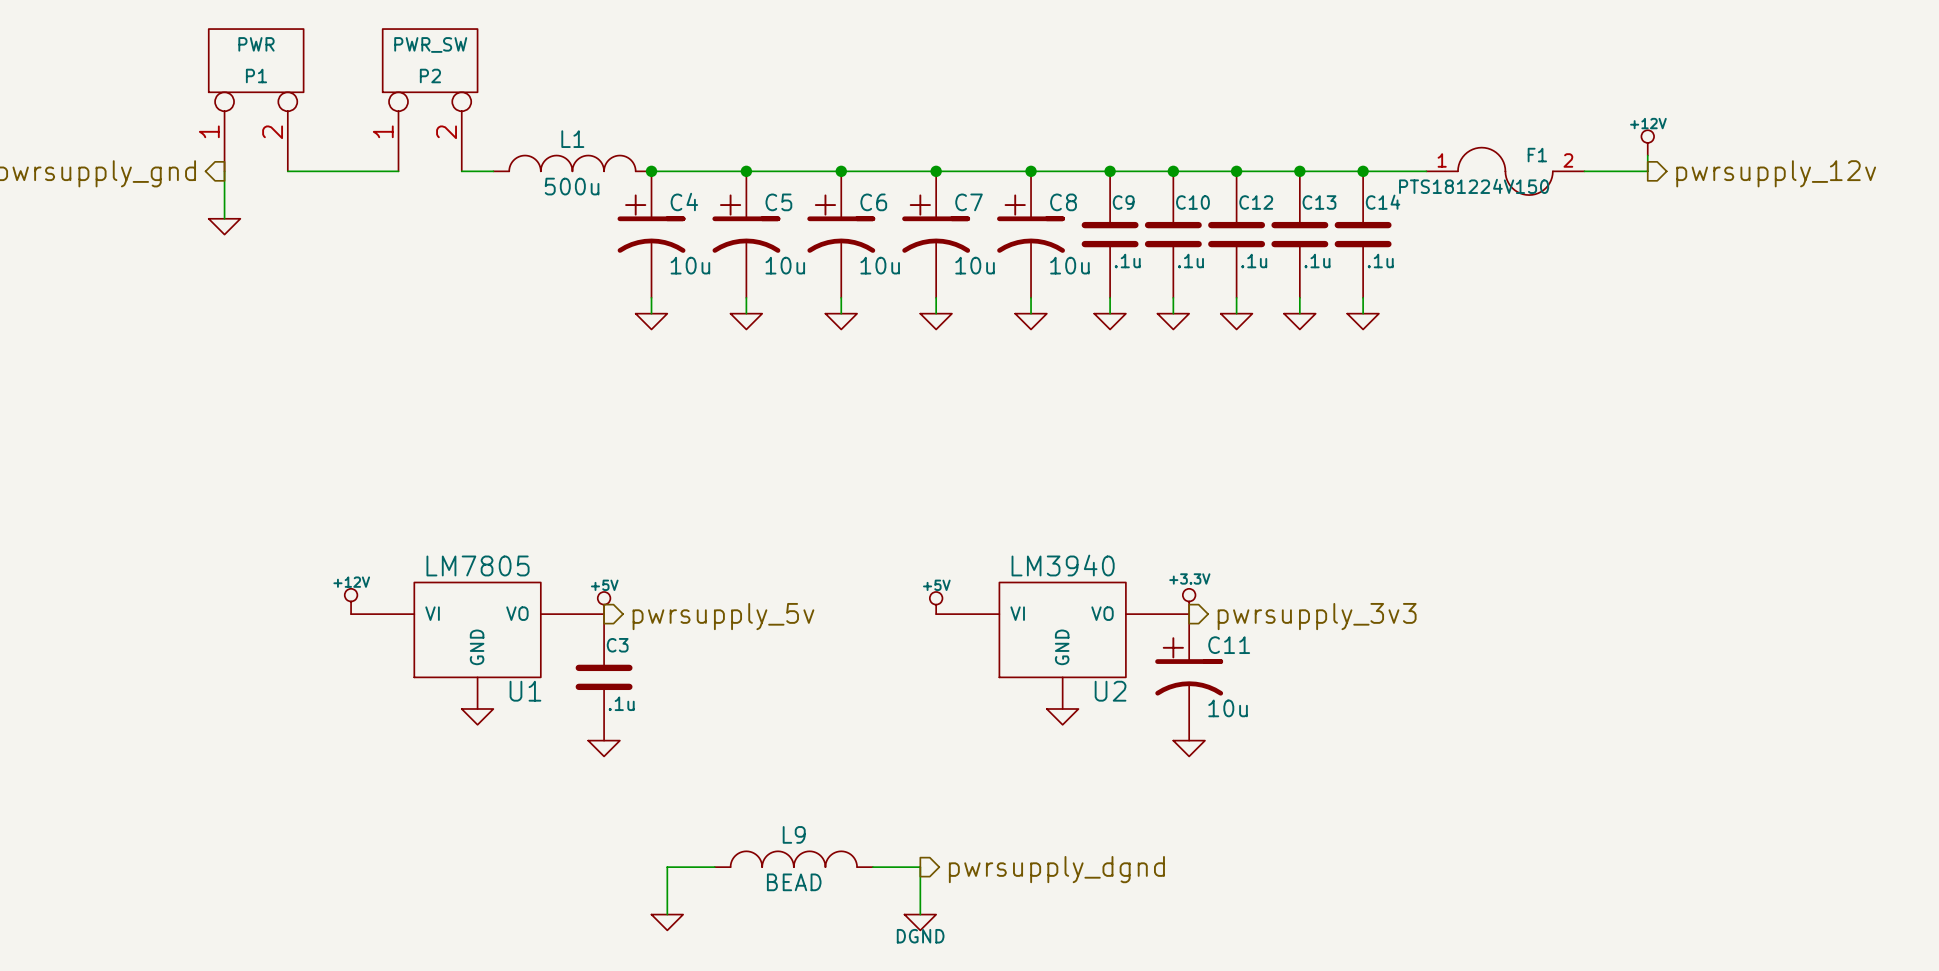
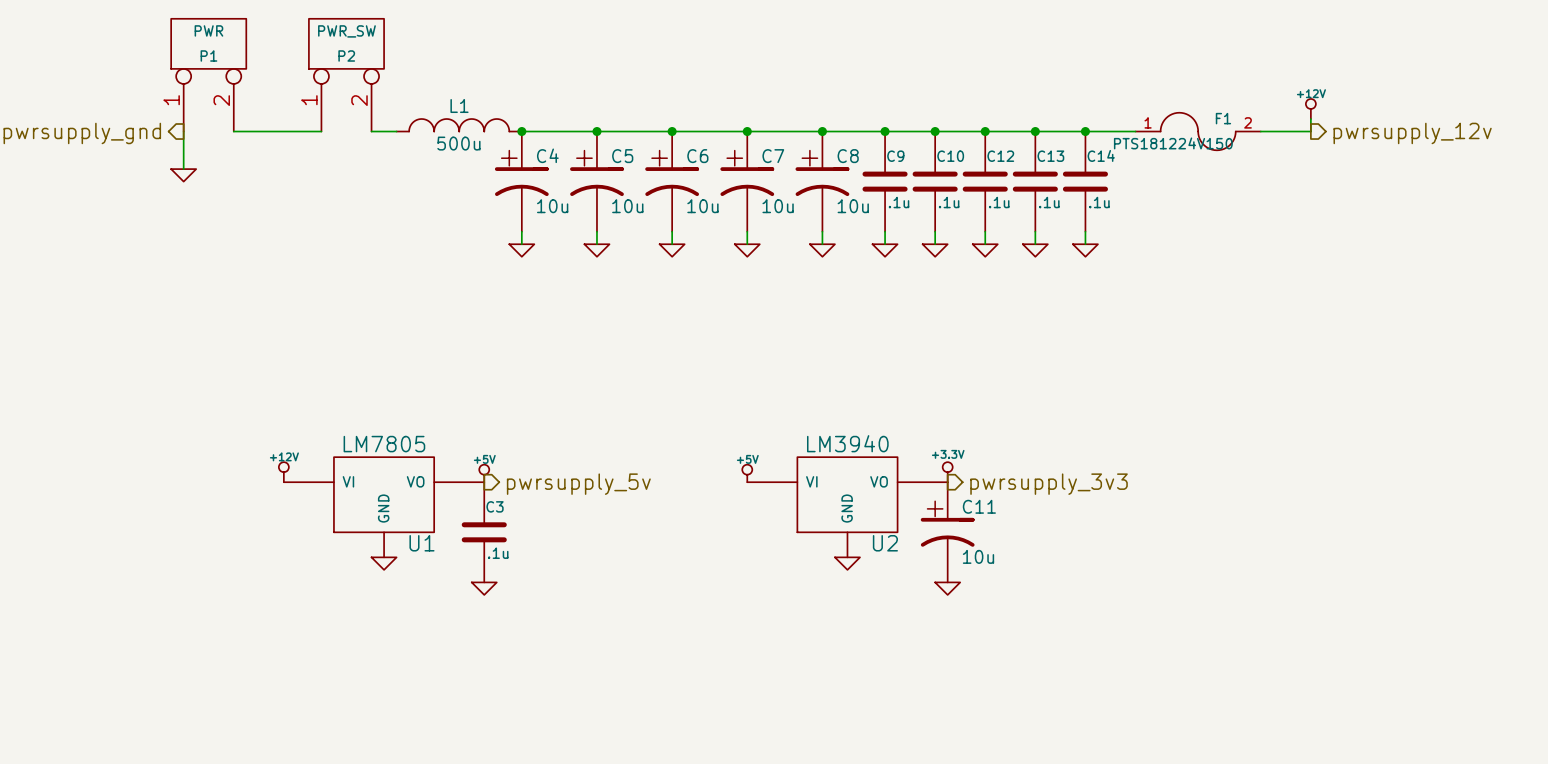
L9: BEAD (793, 859) -> none
wire: (714, 867) (667, 867) (667, 914) -> none
wire: (872, 867) (920, 867) (920, 914) -> none
hierarchical label: pwrsupply_dgnd (1056, 869) -> none
power symbol: (667, 922) -> none
power symbol: DGND (920, 922) -> none

